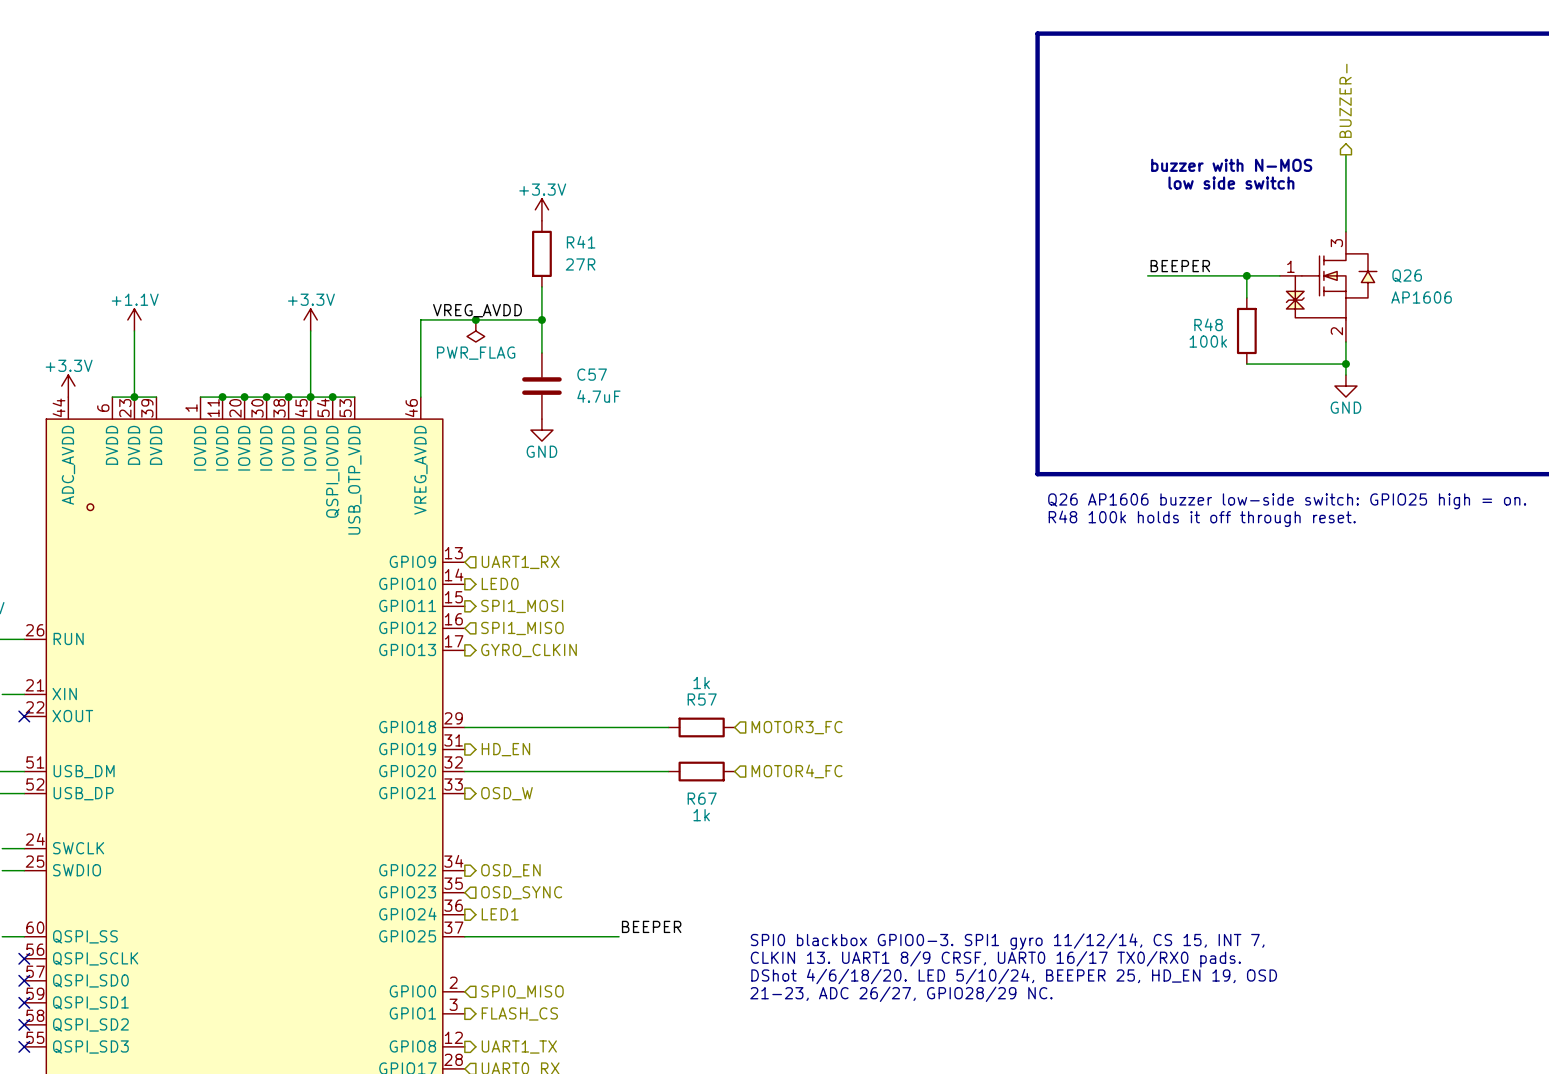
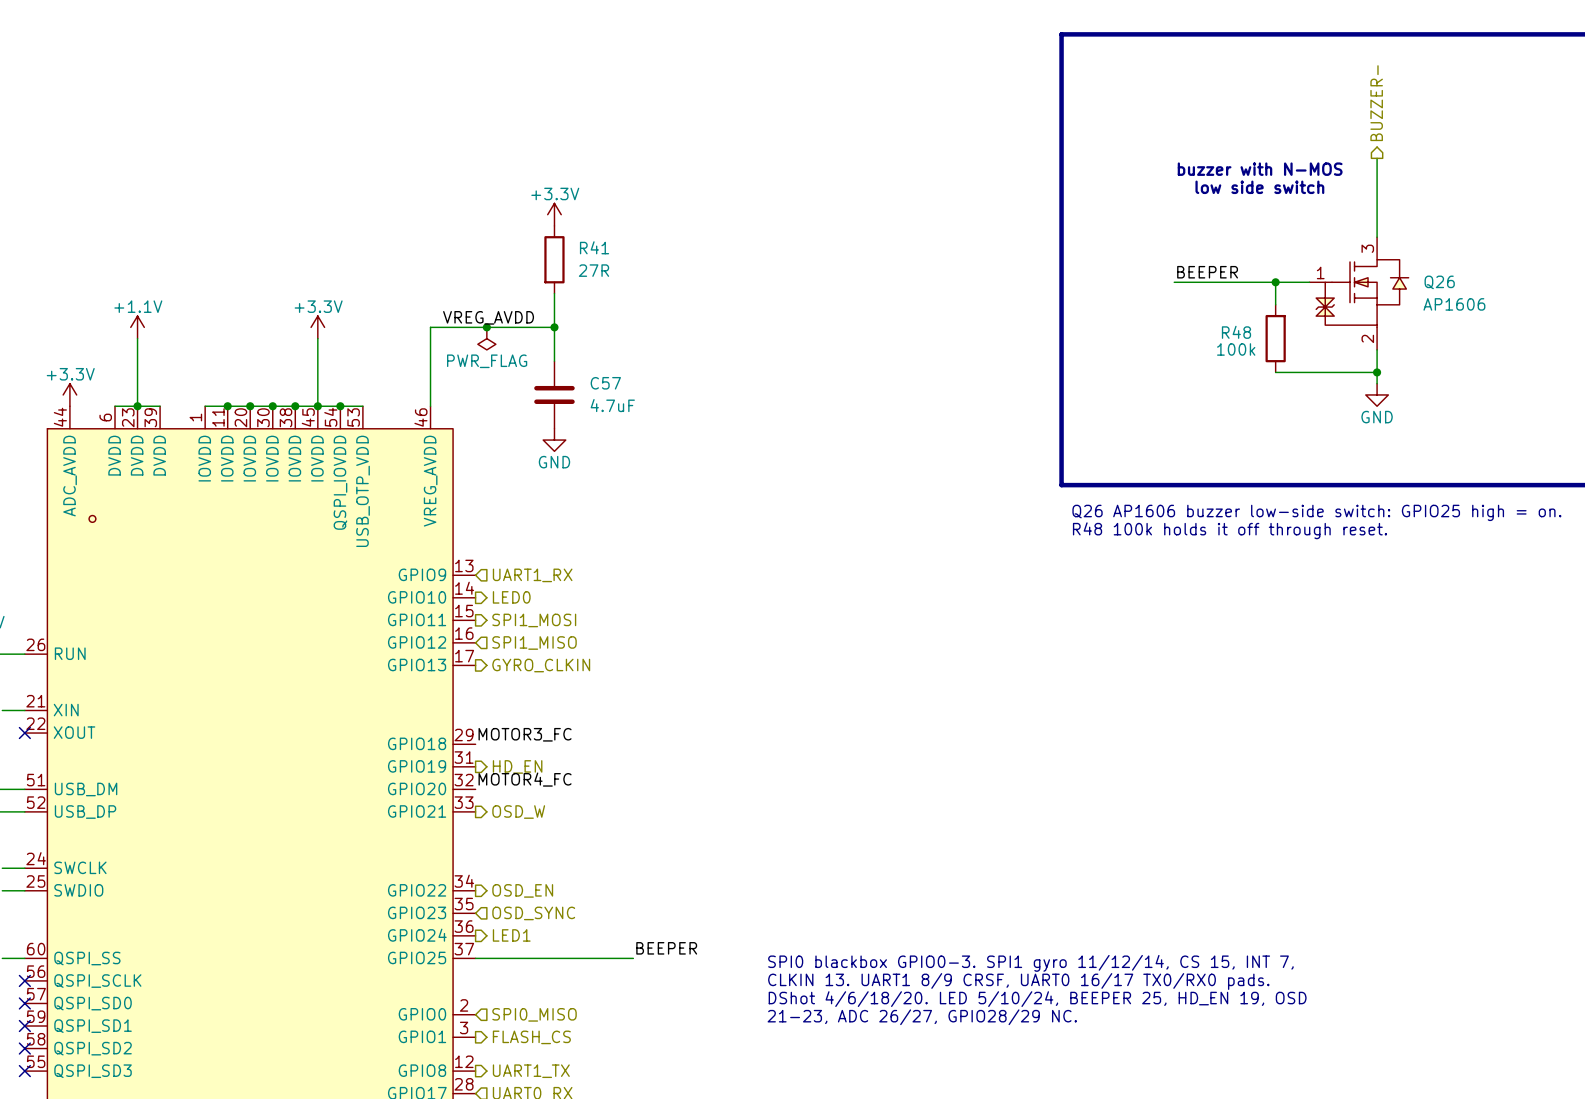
label: none -> MOTOR3_FC (525, 734)
wire: (464, 727) (668, 727) -> none
R57: 1k (701, 727) -> none
hierarchical label: MOTOR3_FC (797, 727) -> none
label: none -> MOTOR4_FC (525, 779)
wire: (464, 771) (668, 771) -> none
R67: 1k (701, 771) -> none
hierarchical label: MOTOR4_FC (797, 771) -> none

